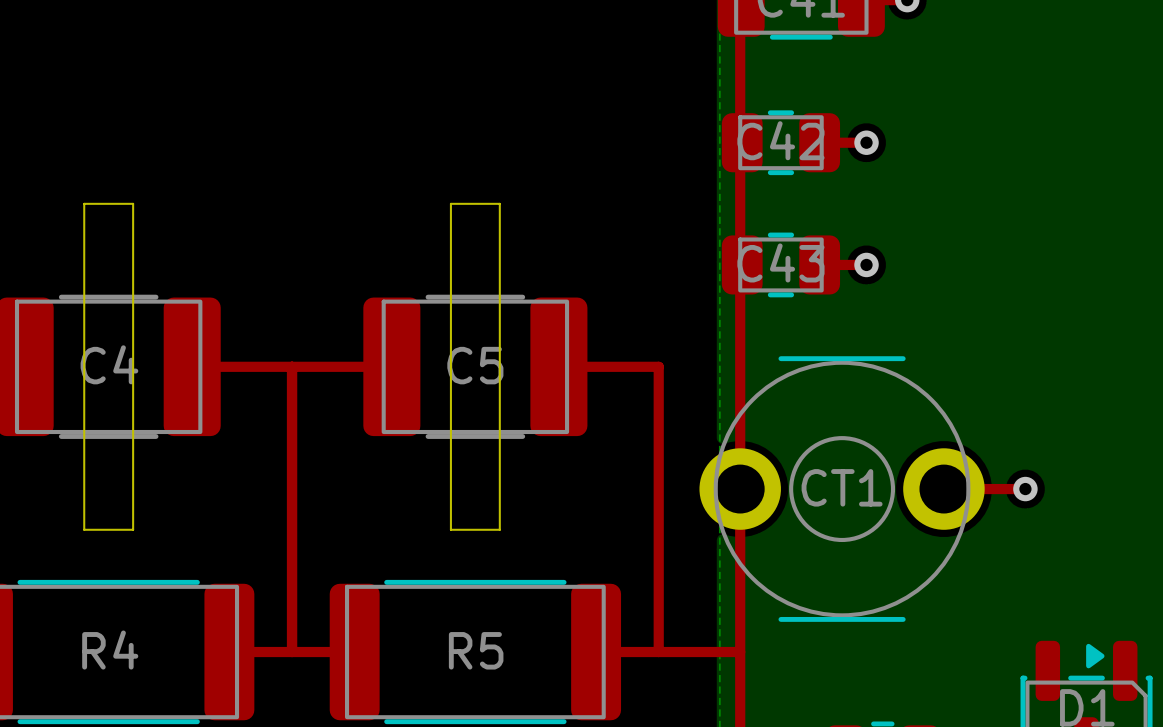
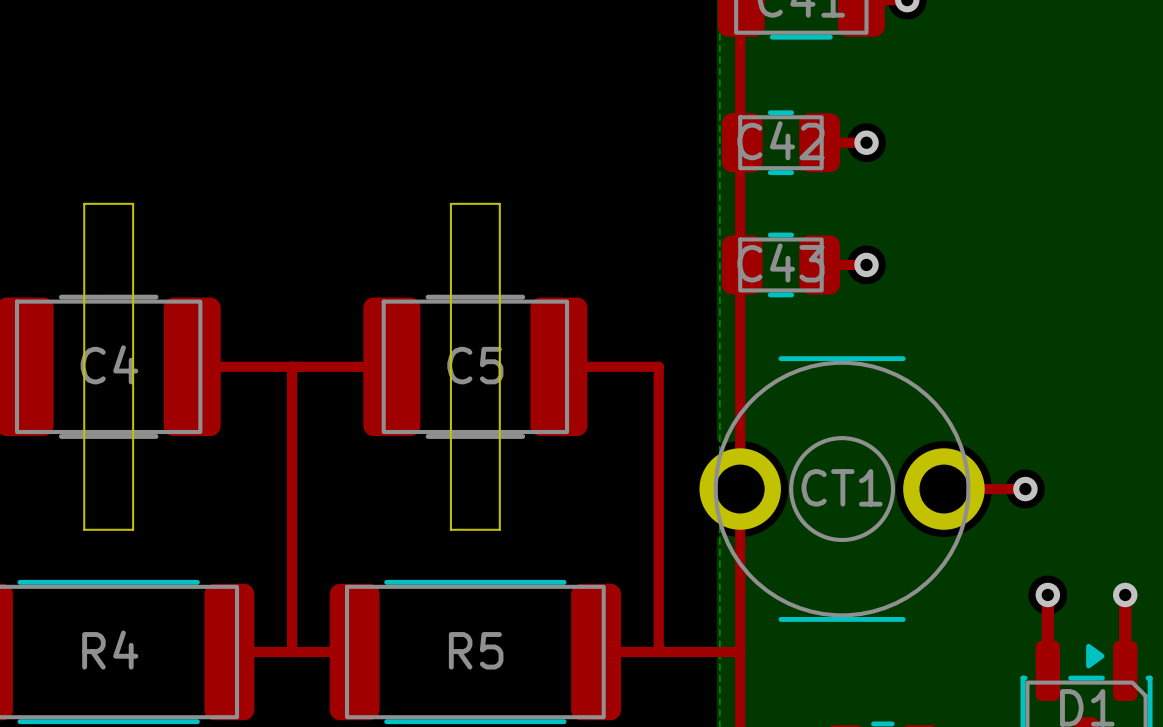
top track: none -> (1047, 594) (1047, 670)
via: none -> (1047, 594)
top track: none -> (1125, 594) (1125, 670)
via: none -> (1125, 594)

